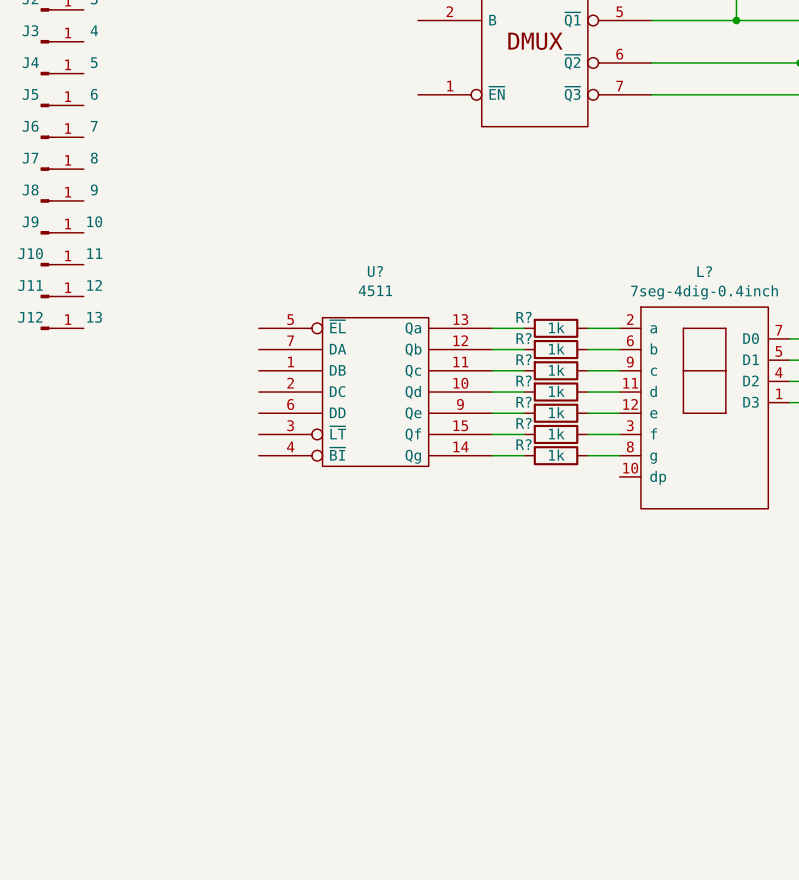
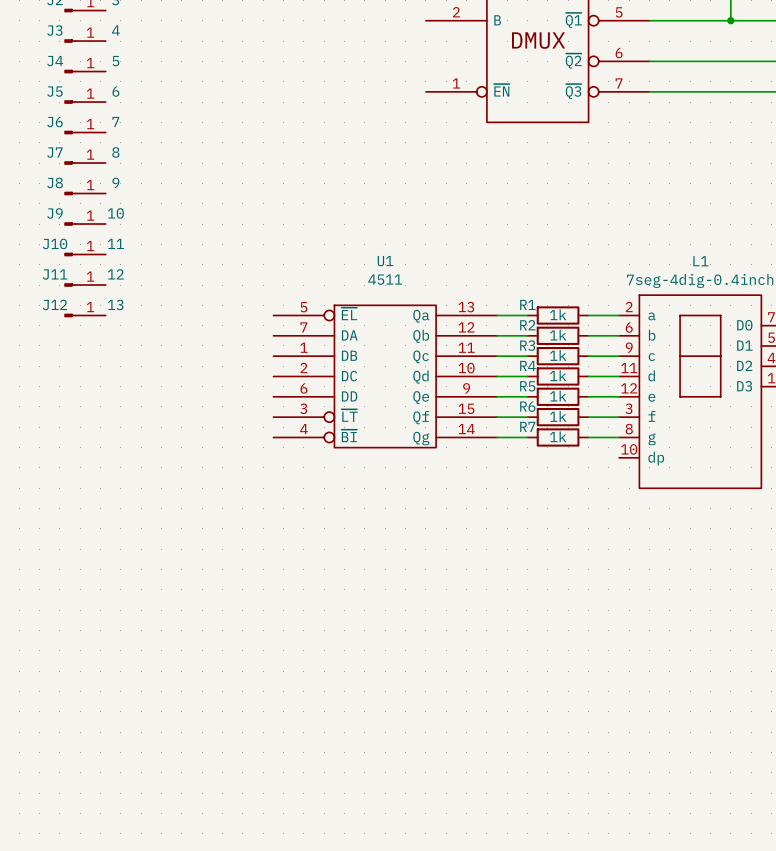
U? name: U? (375, 271) -> U1 (385, 261)
L? name: L? (704, 271) -> L1 (700, 261)
R? name: R? (524, 317) -> R1 (527, 304)
R? name: R? (524, 338) -> R2 (527, 325)
R? name: R? (524, 359) -> R3 (527, 345)
R? name: R? (524, 380) -> R4 (527, 365)
R? name: R? (524, 402) -> R5 (527, 386)
R? name: R? (524, 423) -> R6 (527, 406)
R? name: R? (524, 444) -> R7 (527, 426)

